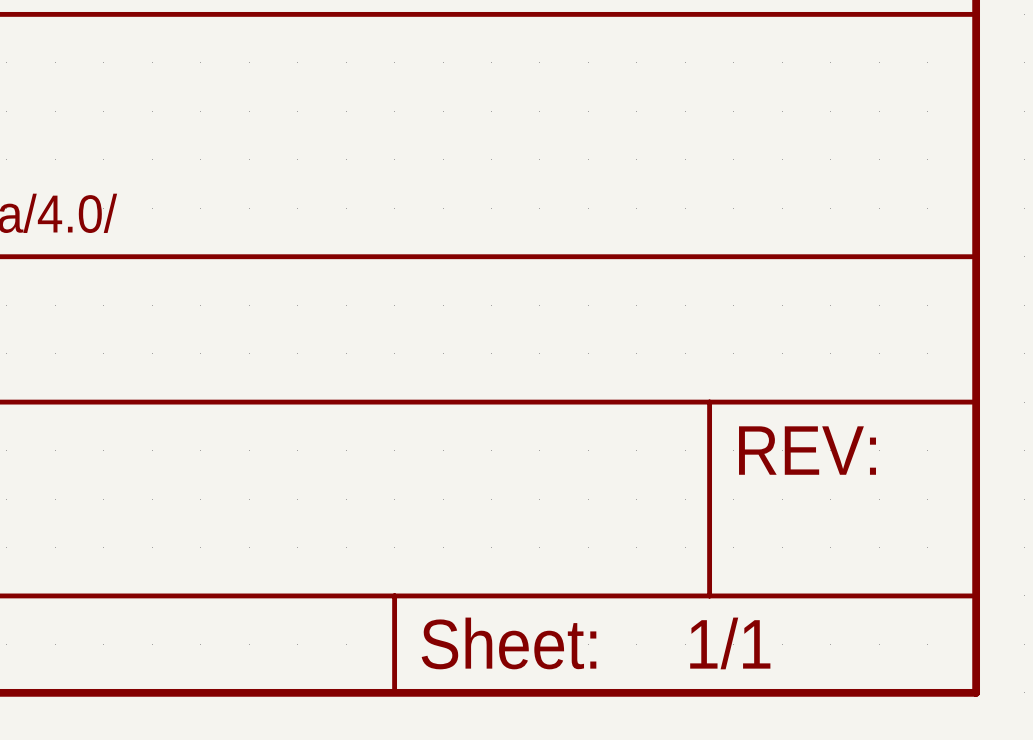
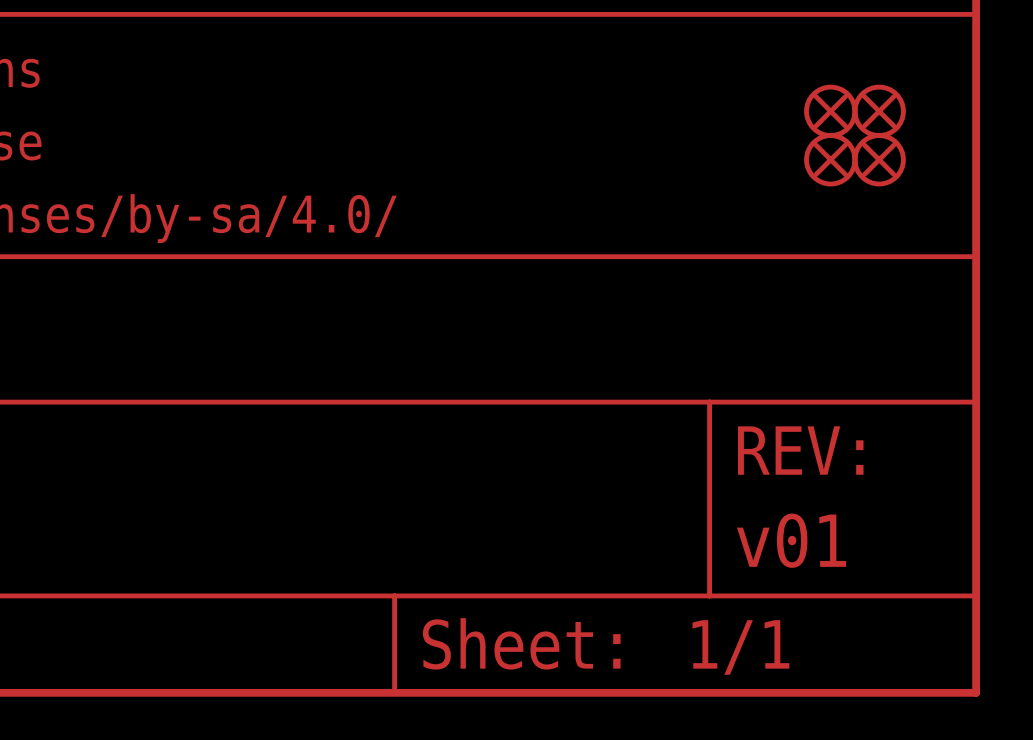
part: none -> (830, 111)
part: none -> (879, 111)
part: none -> (830, 159)
part: none -> (879, 159)
part text: none -> v01 (791, 540)

